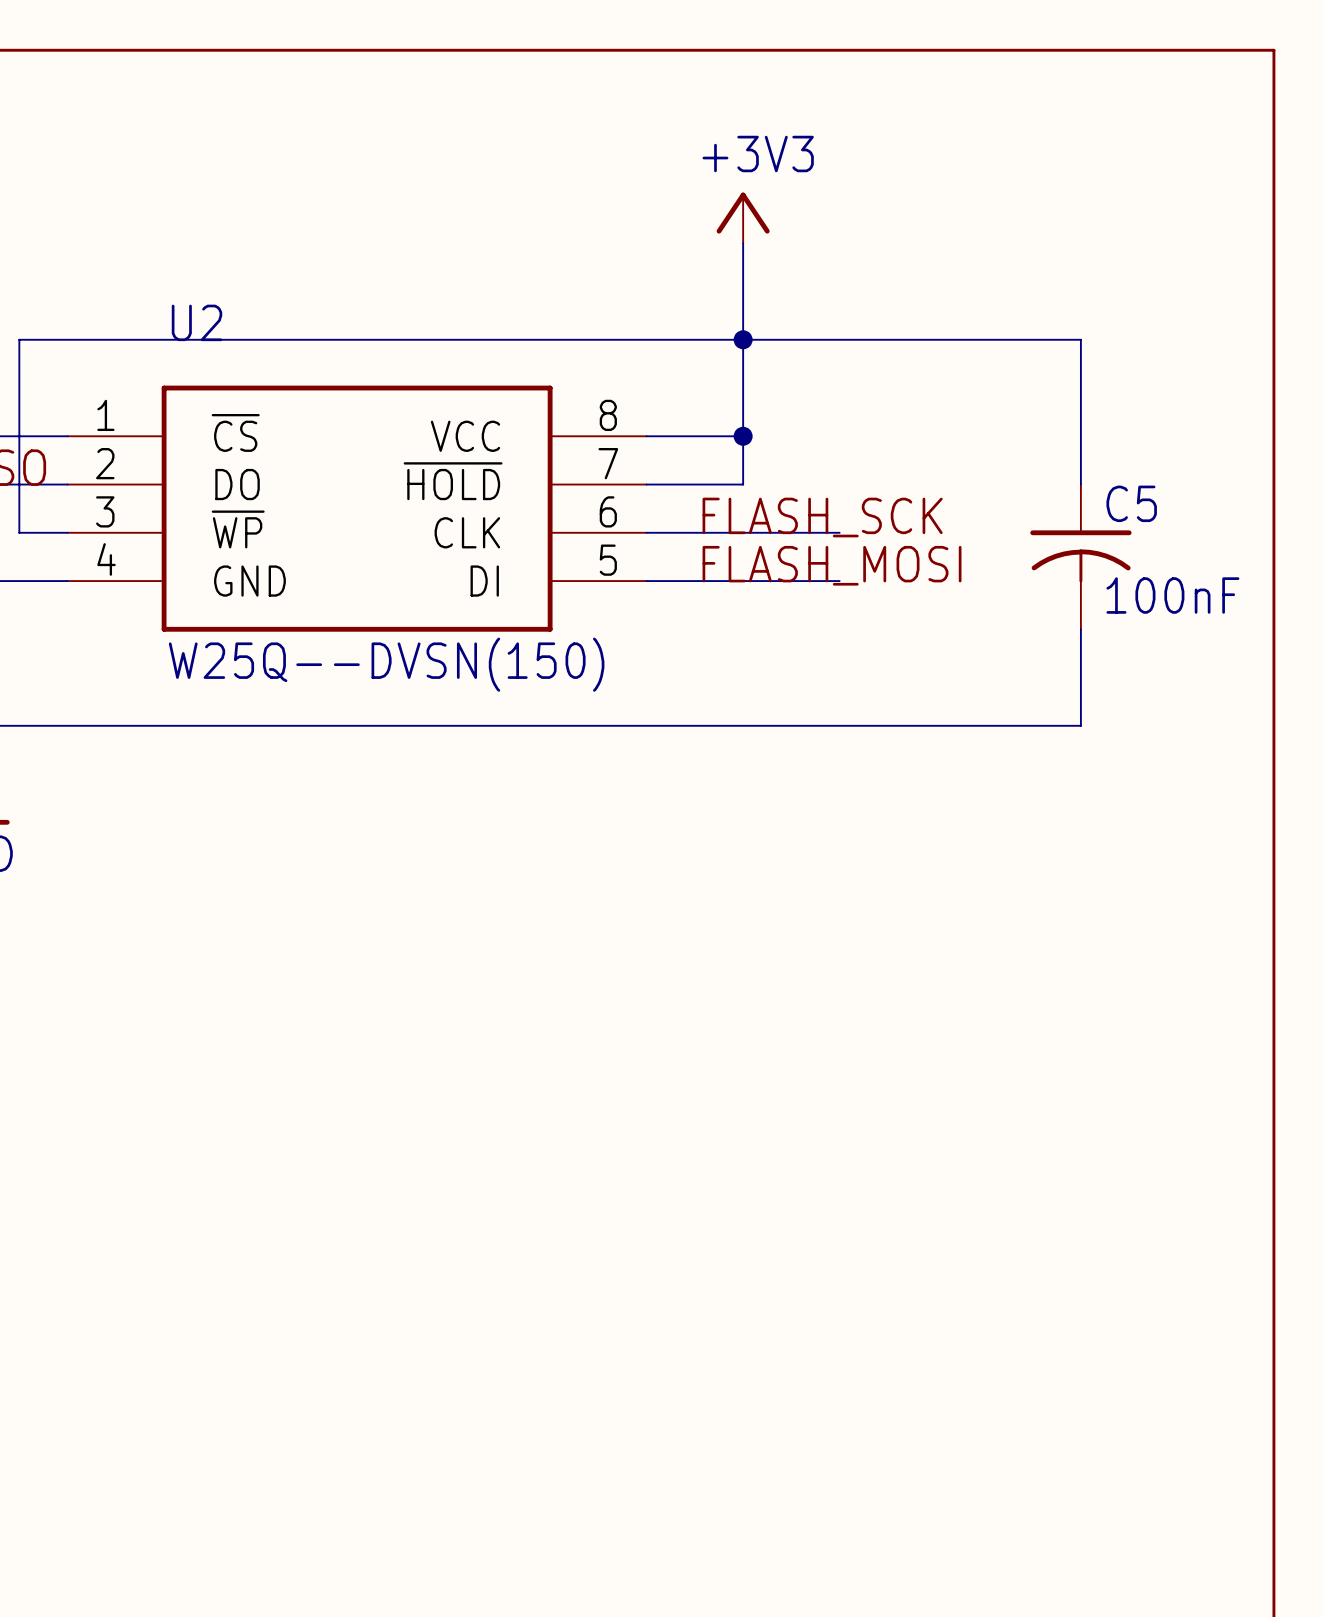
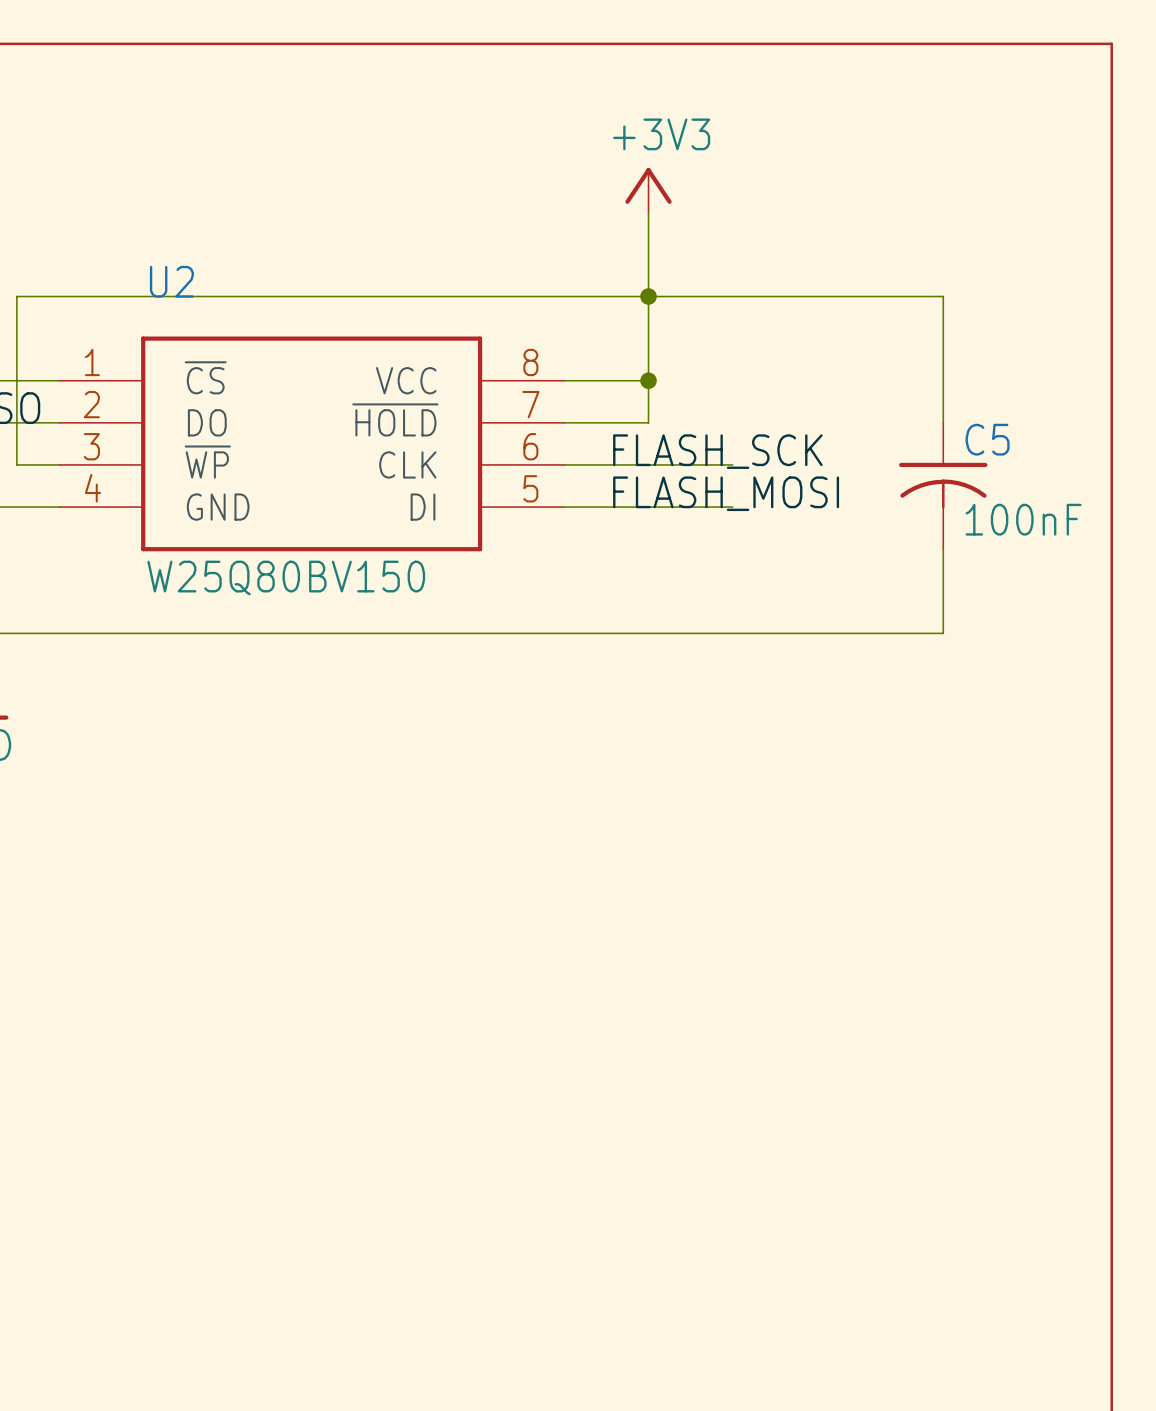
U2 value: W25Q--DVSN(150) (386, 664) -> W25Q80BV150 (286, 577)

